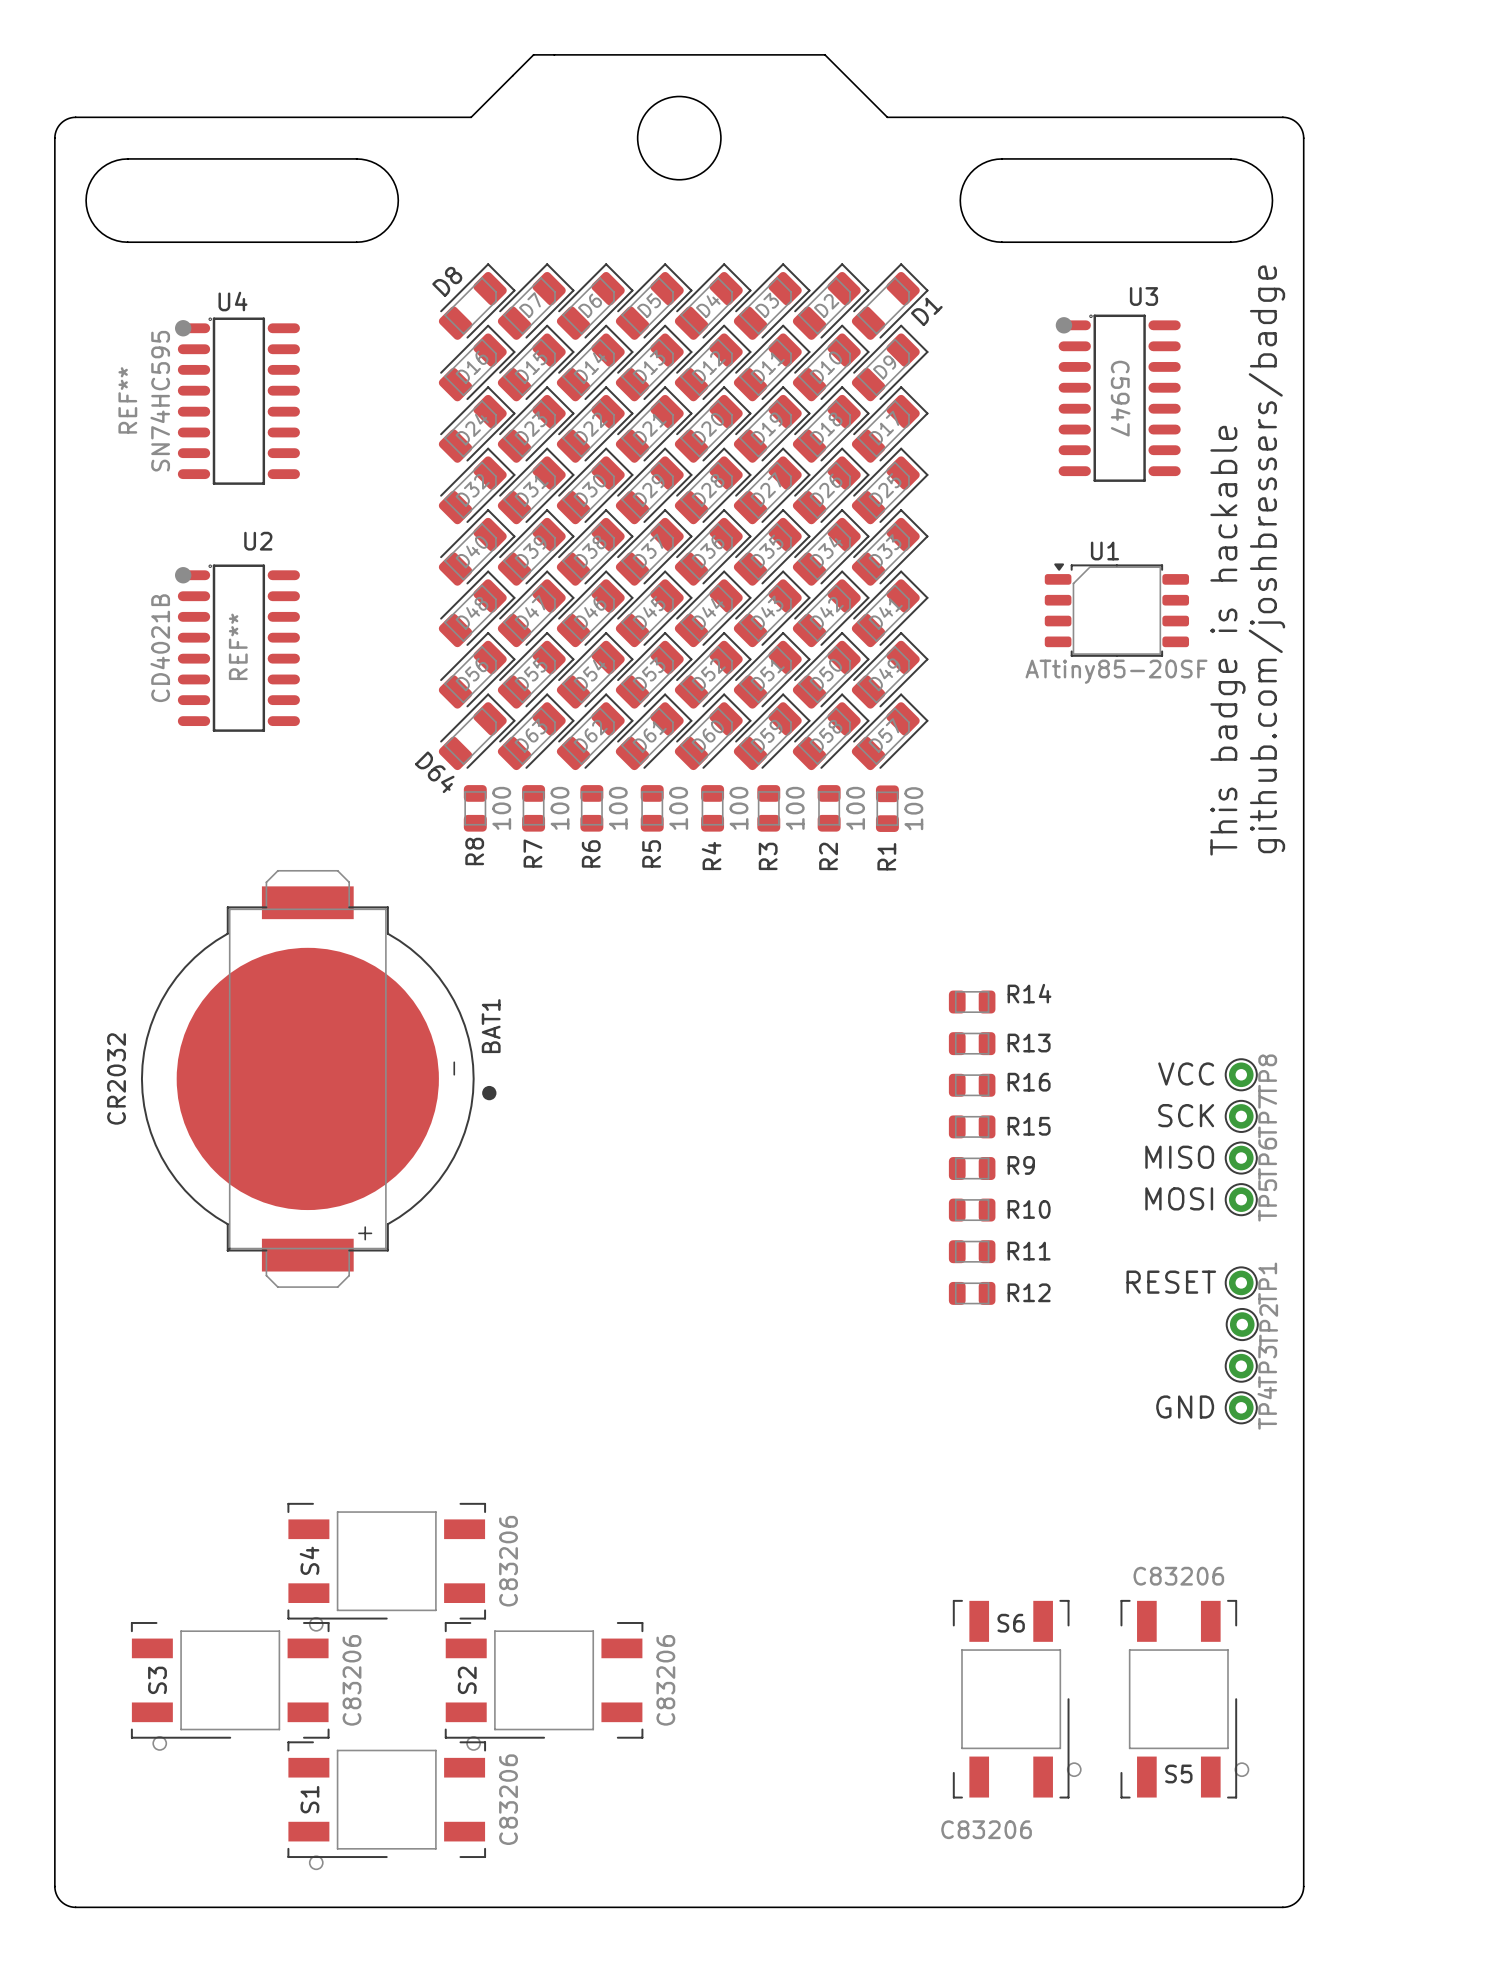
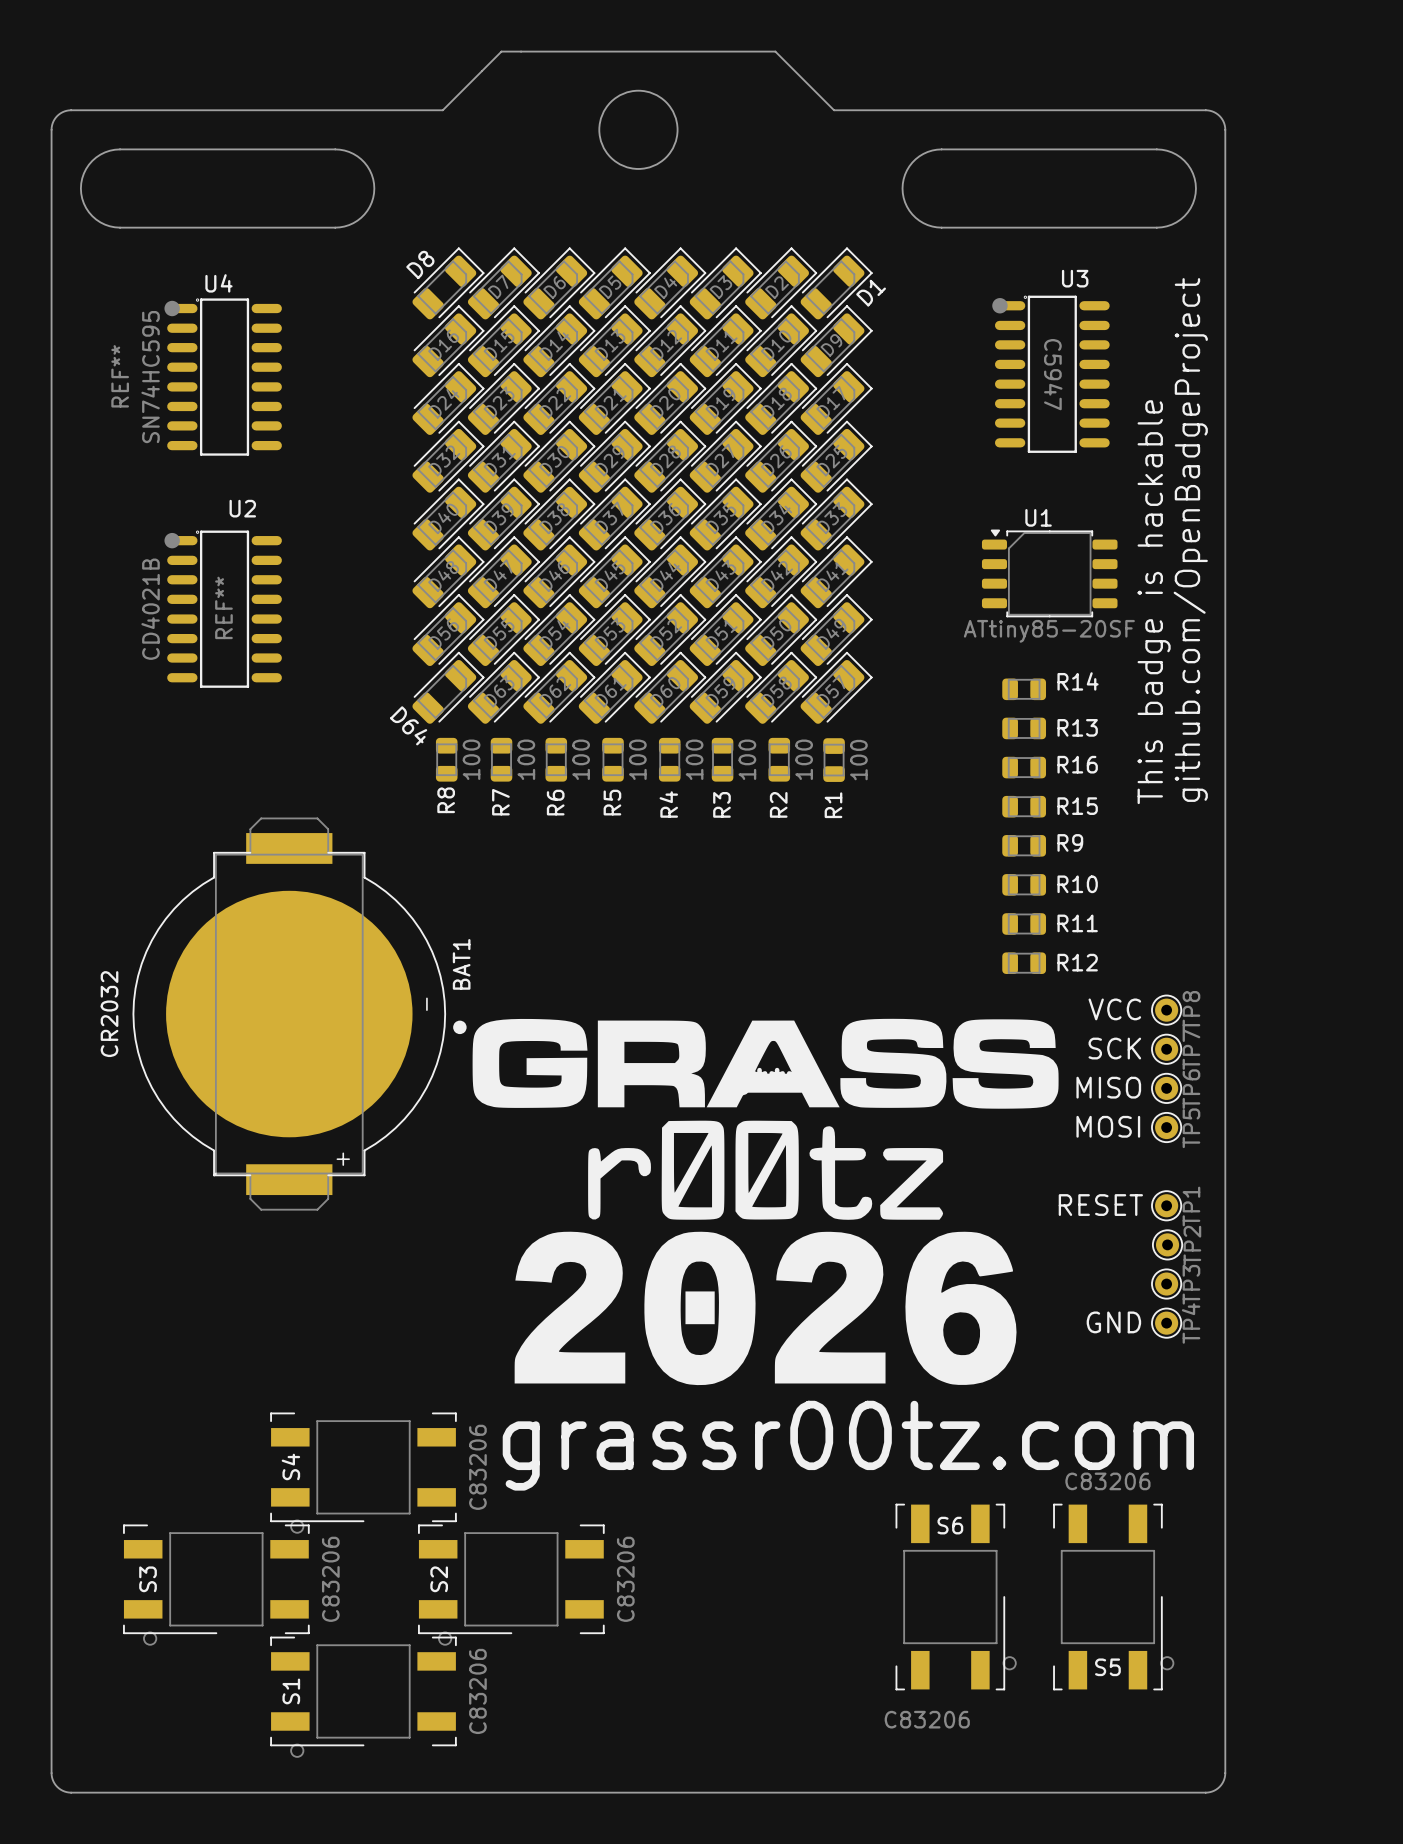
text: github.com/joshbressers/badge (1266, 559) -> github.com/OpenBadgeProject (1190, 540)
R14 position: (972, 1002) -> (1024, 689)
R13 position: (972, 1043) -> (1024, 728)
R16 position: (972, 1085) -> (1024, 767)
R15 position: (972, 1126) -> (1024, 806)
R9 position: (972, 1168) -> (1024, 845)
R10 position: (972, 1210) -> (1024, 884)
R11 position: (972, 1251) -> (1024, 923)
part: none -> (765, 1201)
R12 position: (972, 1293) -> (1024, 963)
text: none -> grassr00tz.com (848, 1445)

